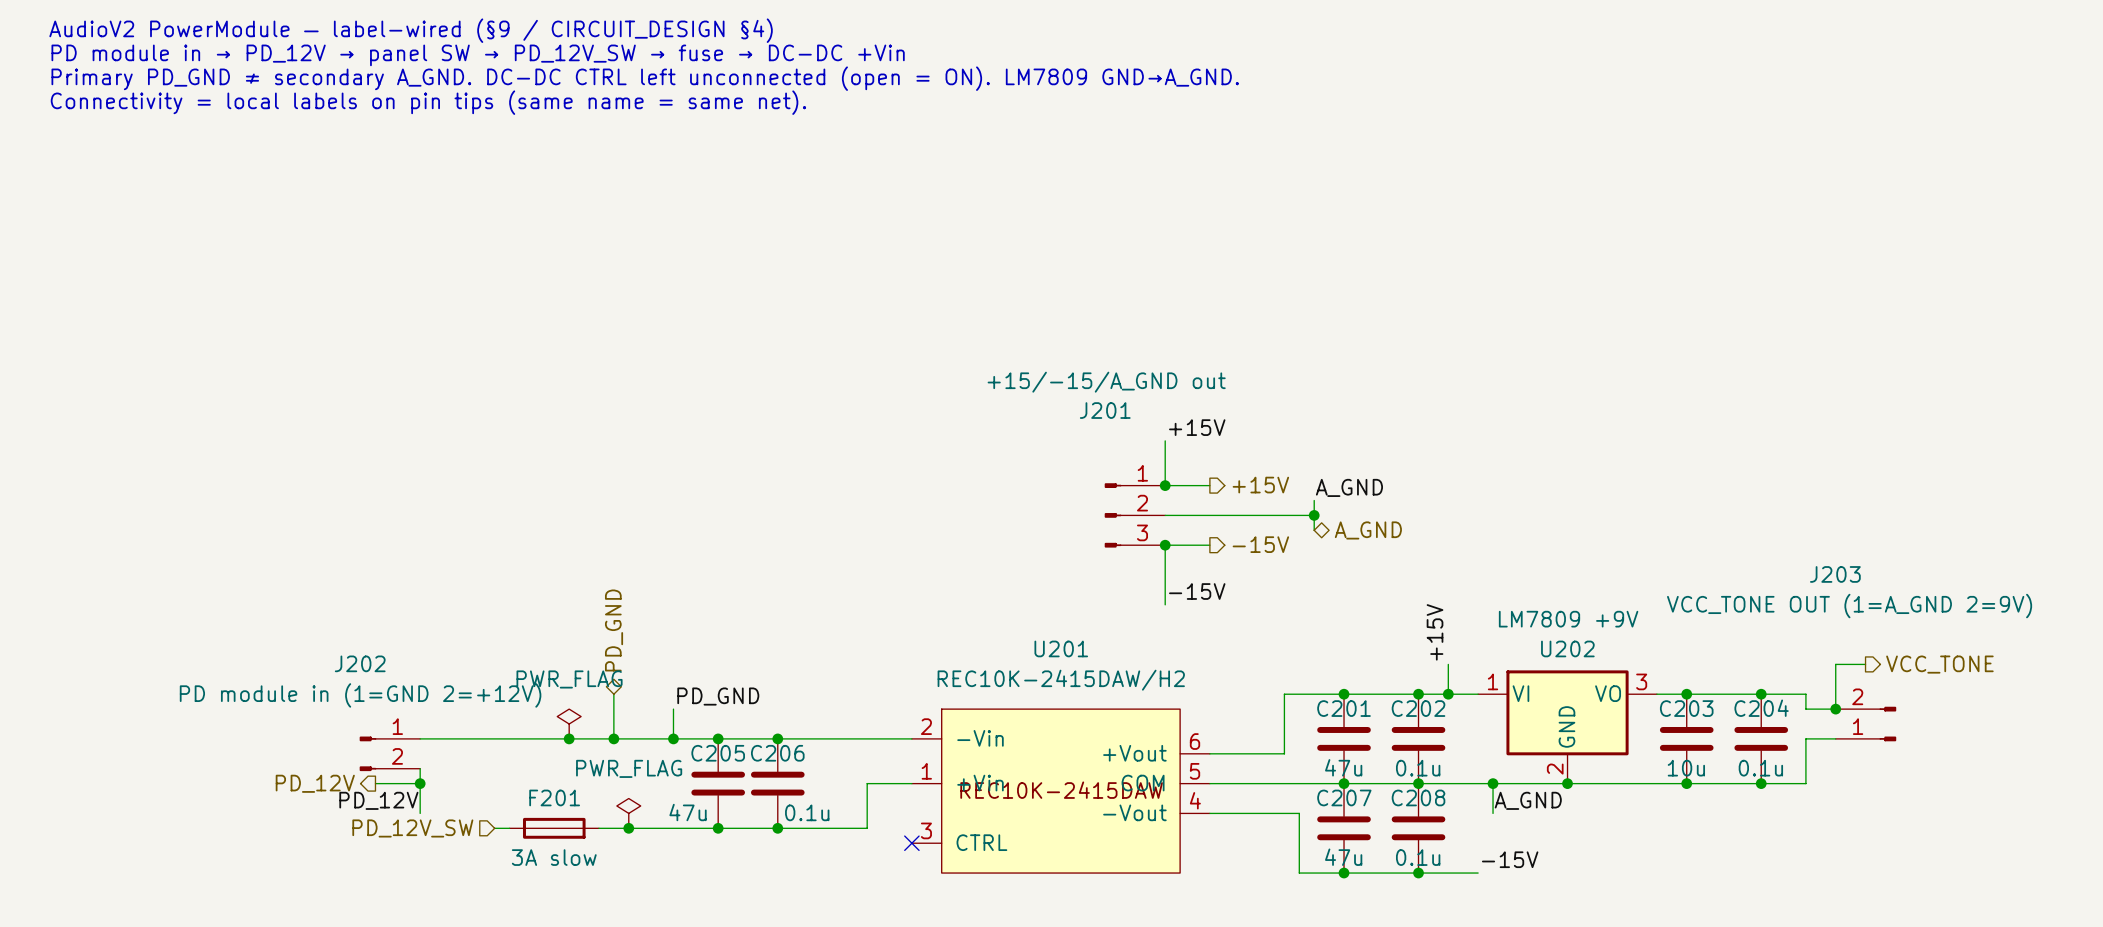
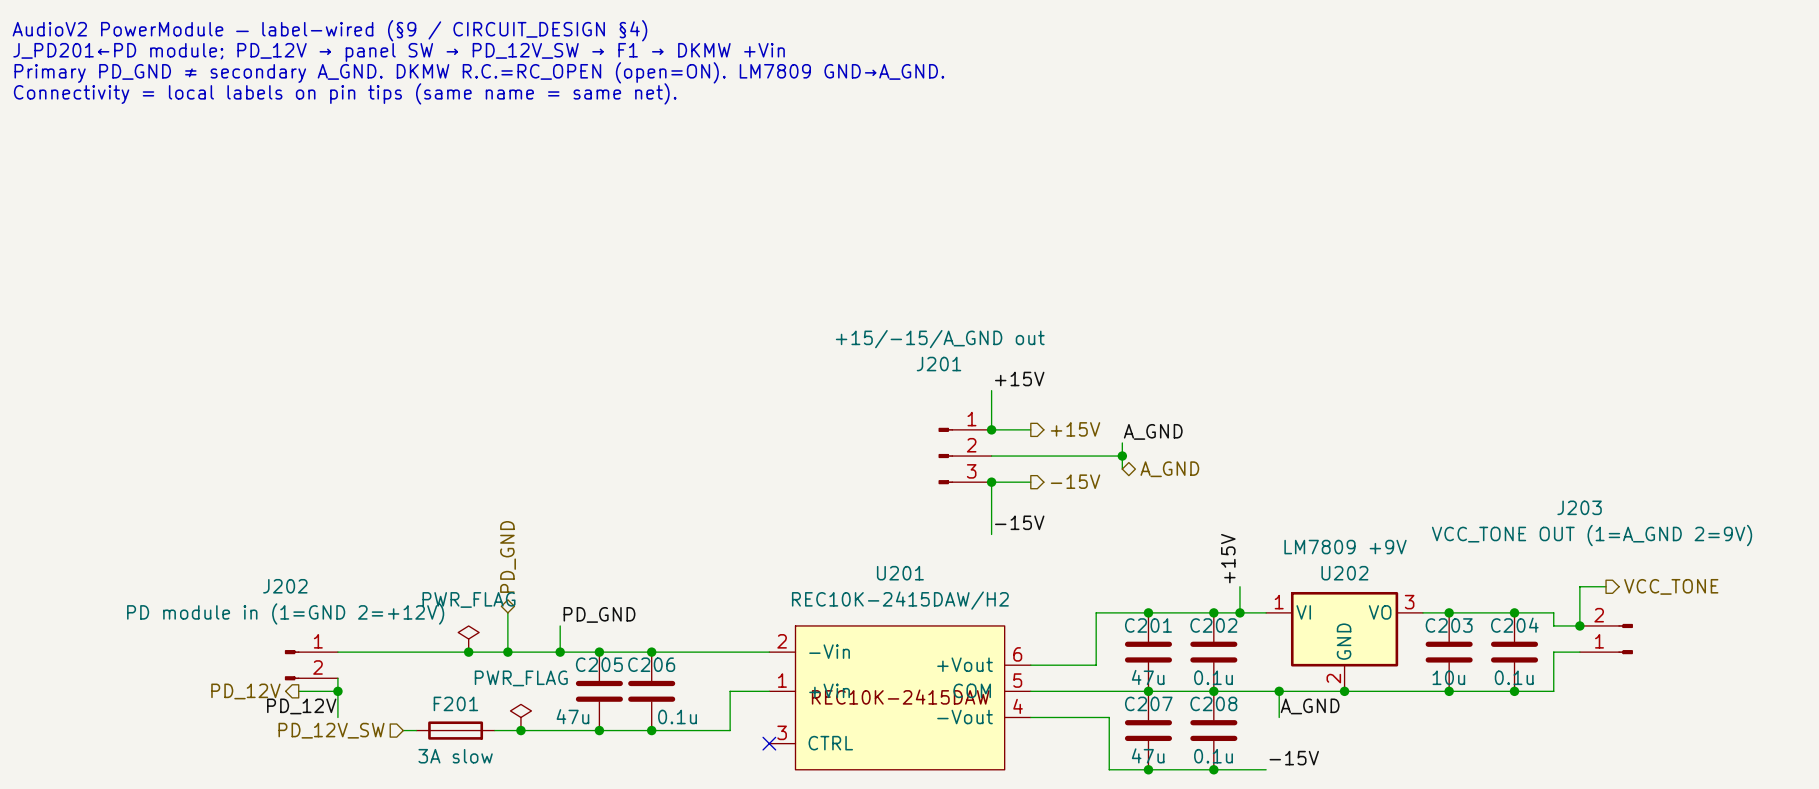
text: PD module in → PD_12V → panel SW → PD_12V_SW → fuse → DC-DC +Vin (478, 55) -> J_PD201←PD module; PD_12V → panel SW → PD_12V_SW → F1 → DKMW +Vin (399, 52)
text: Primary PD_GND ≠ secondary A_GND. DC-DC CTRL left unconnected (open = ON). LM7809 GND→A_GND. (645, 78) -> Primary PD_GND ≠ secondary A_GND. DKMW R.C.=RC_OPEN (open=ON). LM7809 GND→A_GND. (479, 72)

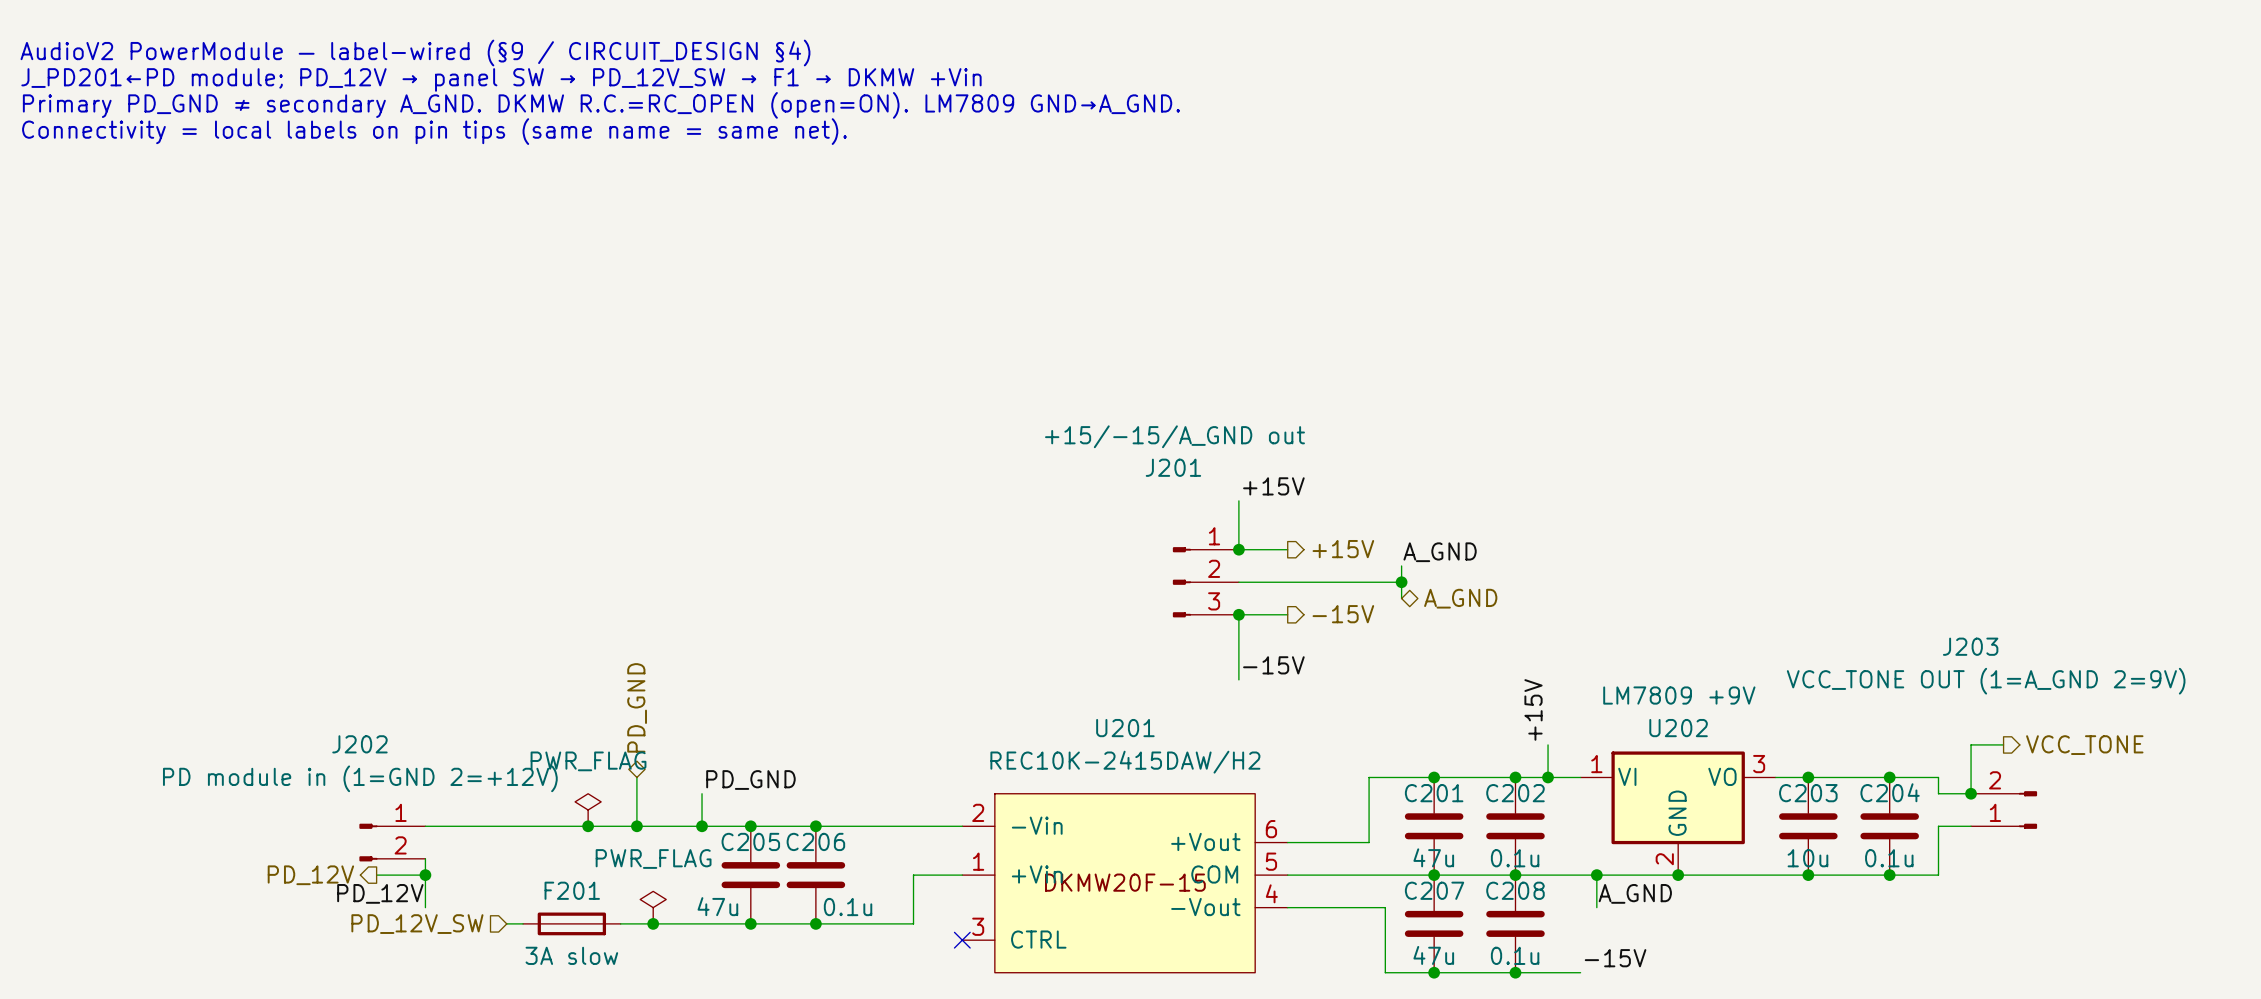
U201 text: REC10K-2415DAW (900, 697) -> DKMW20F-15 (1125, 882)

